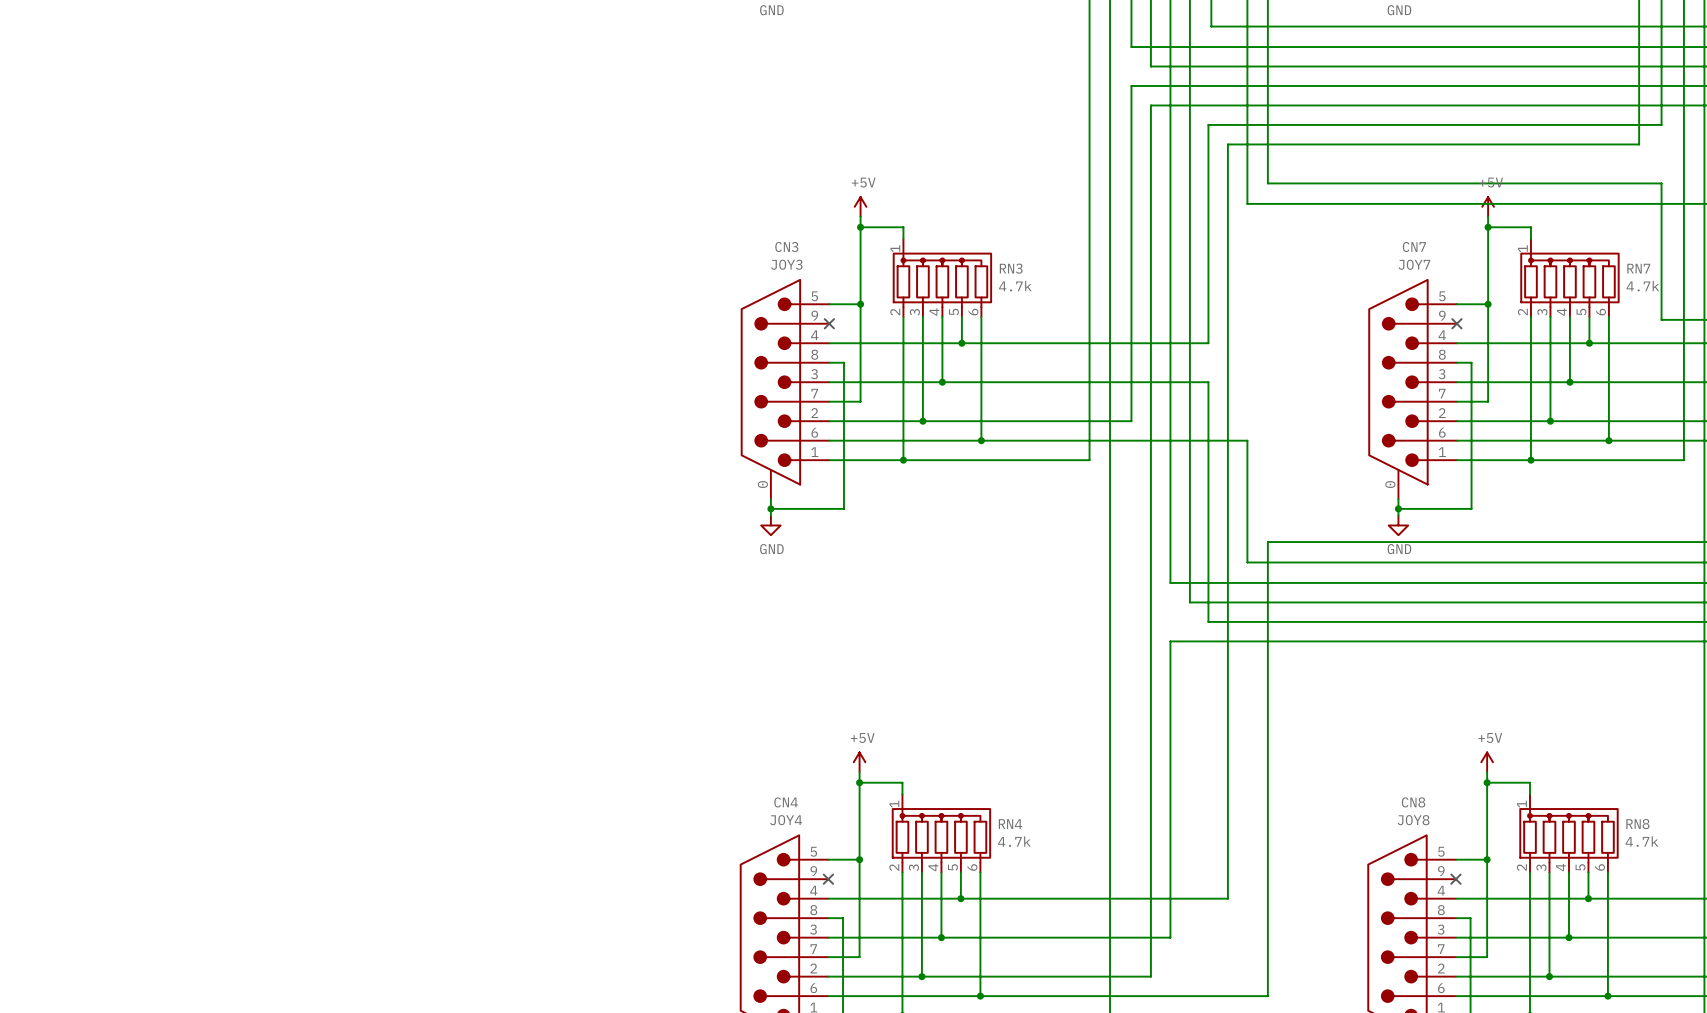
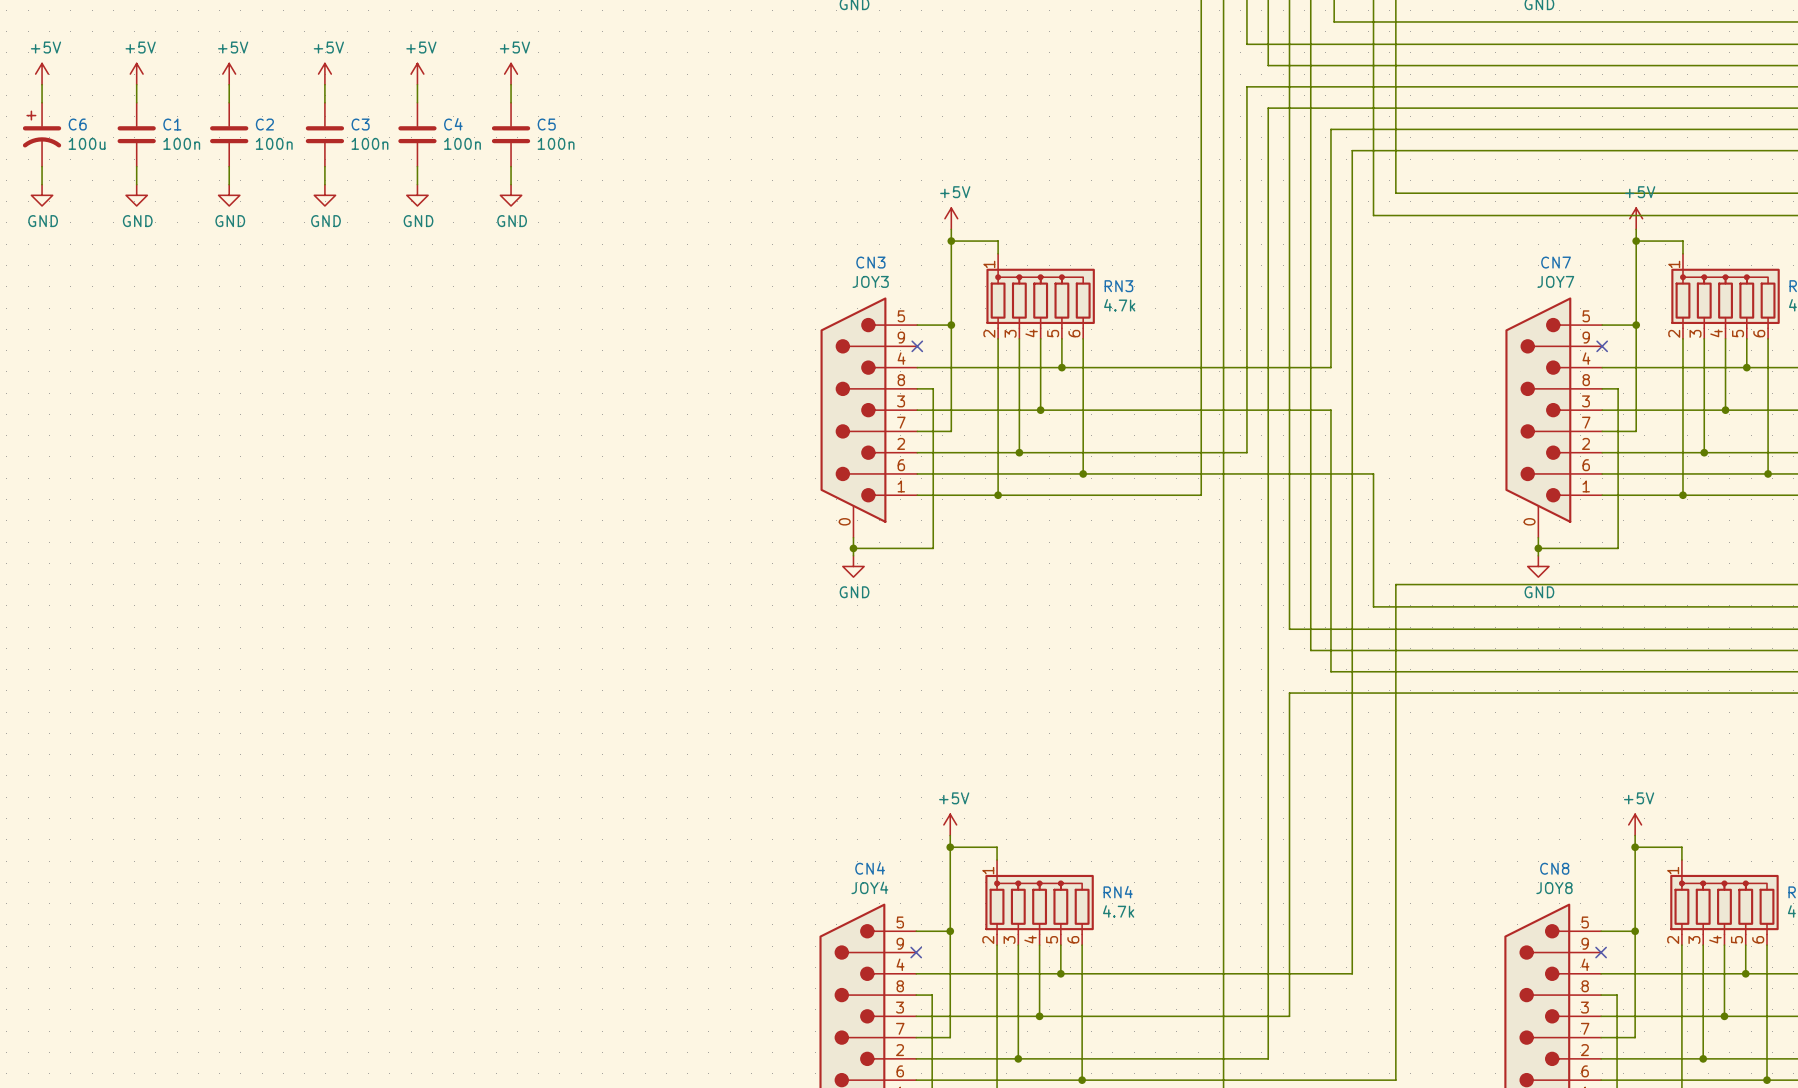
power symbol: none -> +5V (42, 74)
power symbol: none -> +5V (136, 74)
power symbol: none -> +5V (229, 74)
power symbol: none -> +5V (324, 74)
power symbol: none -> +5V (417, 74)
power symbol: none -> +5V (511, 74)
wire: none -> (42, 84) (42, 102)
wire: none -> (136, 84) (136, 102)
wire: none -> (229, 84) (229, 102)
wire: none -> (324, 84) (324, 102)
wire: none -> (417, 84) (417, 102)
wire: none -> (511, 84) (511, 102)
C6: none -> 100u (42, 134)
C1: none -> 100n (136, 134)
C2: none -> 100n (229, 134)
C3: none -> 100n (324, 134)
C4: none -> 100n (417, 134)
C5: none -> 100n (511, 134)
wire: none -> (42, 166) (42, 184)
wire: none -> (136, 166) (136, 184)
wire: none -> (229, 166) (229, 184)
wire: none -> (324, 166) (324, 184)
wire: none -> (417, 166) (417, 184)
wire: none -> (511, 166) (511, 184)
power symbol: none -> GND (42, 195)
power symbol: none -> GND (136, 195)
power symbol: none -> GND (229, 195)
power symbol: none -> GND (324, 195)
power symbol: none -> GND (417, 195)
power symbol: none -> GND (511, 195)

